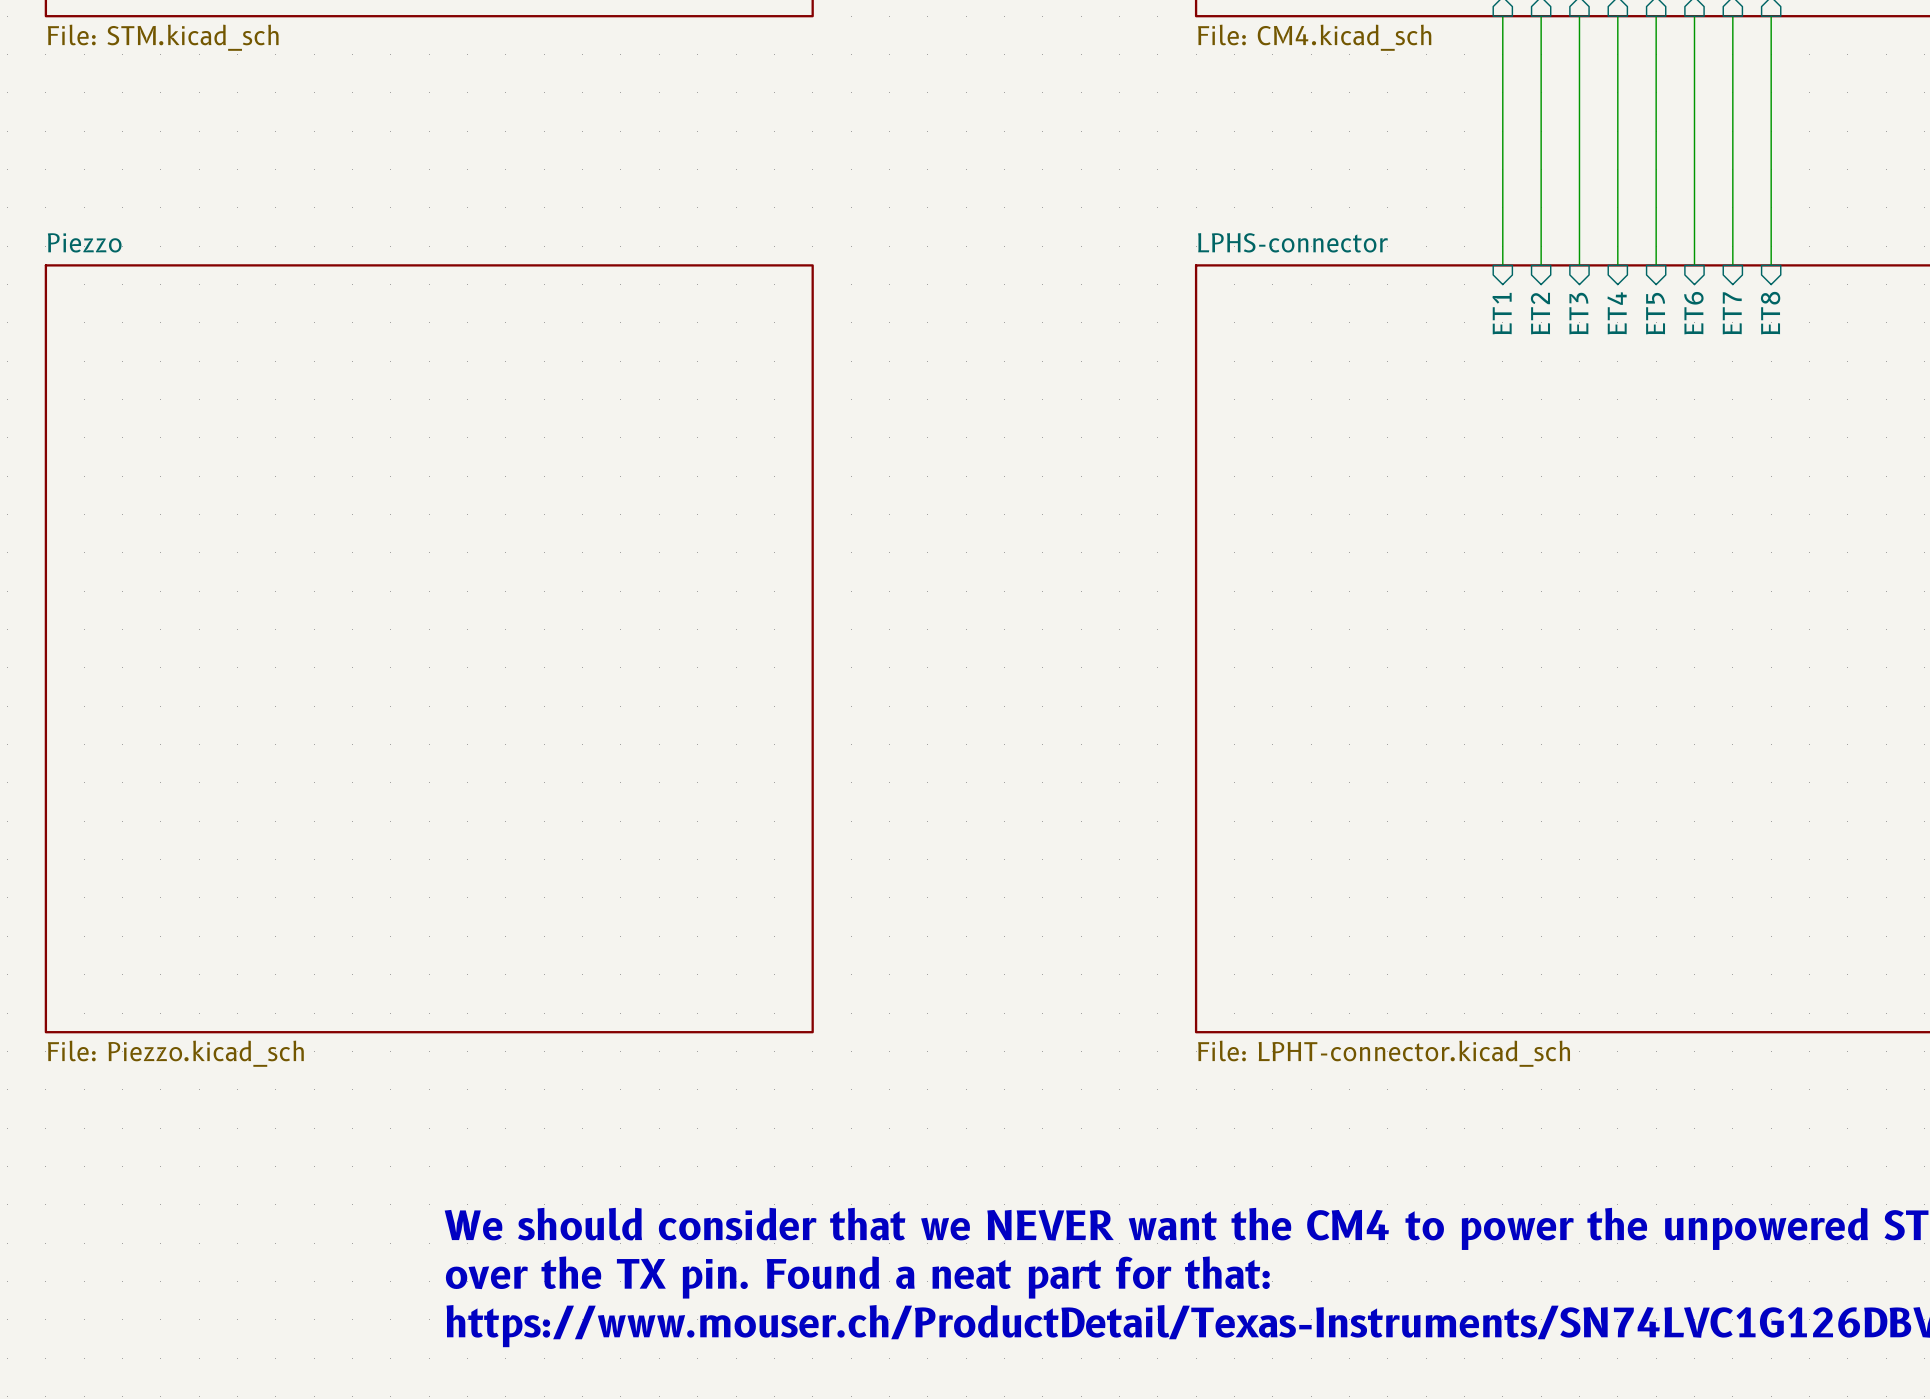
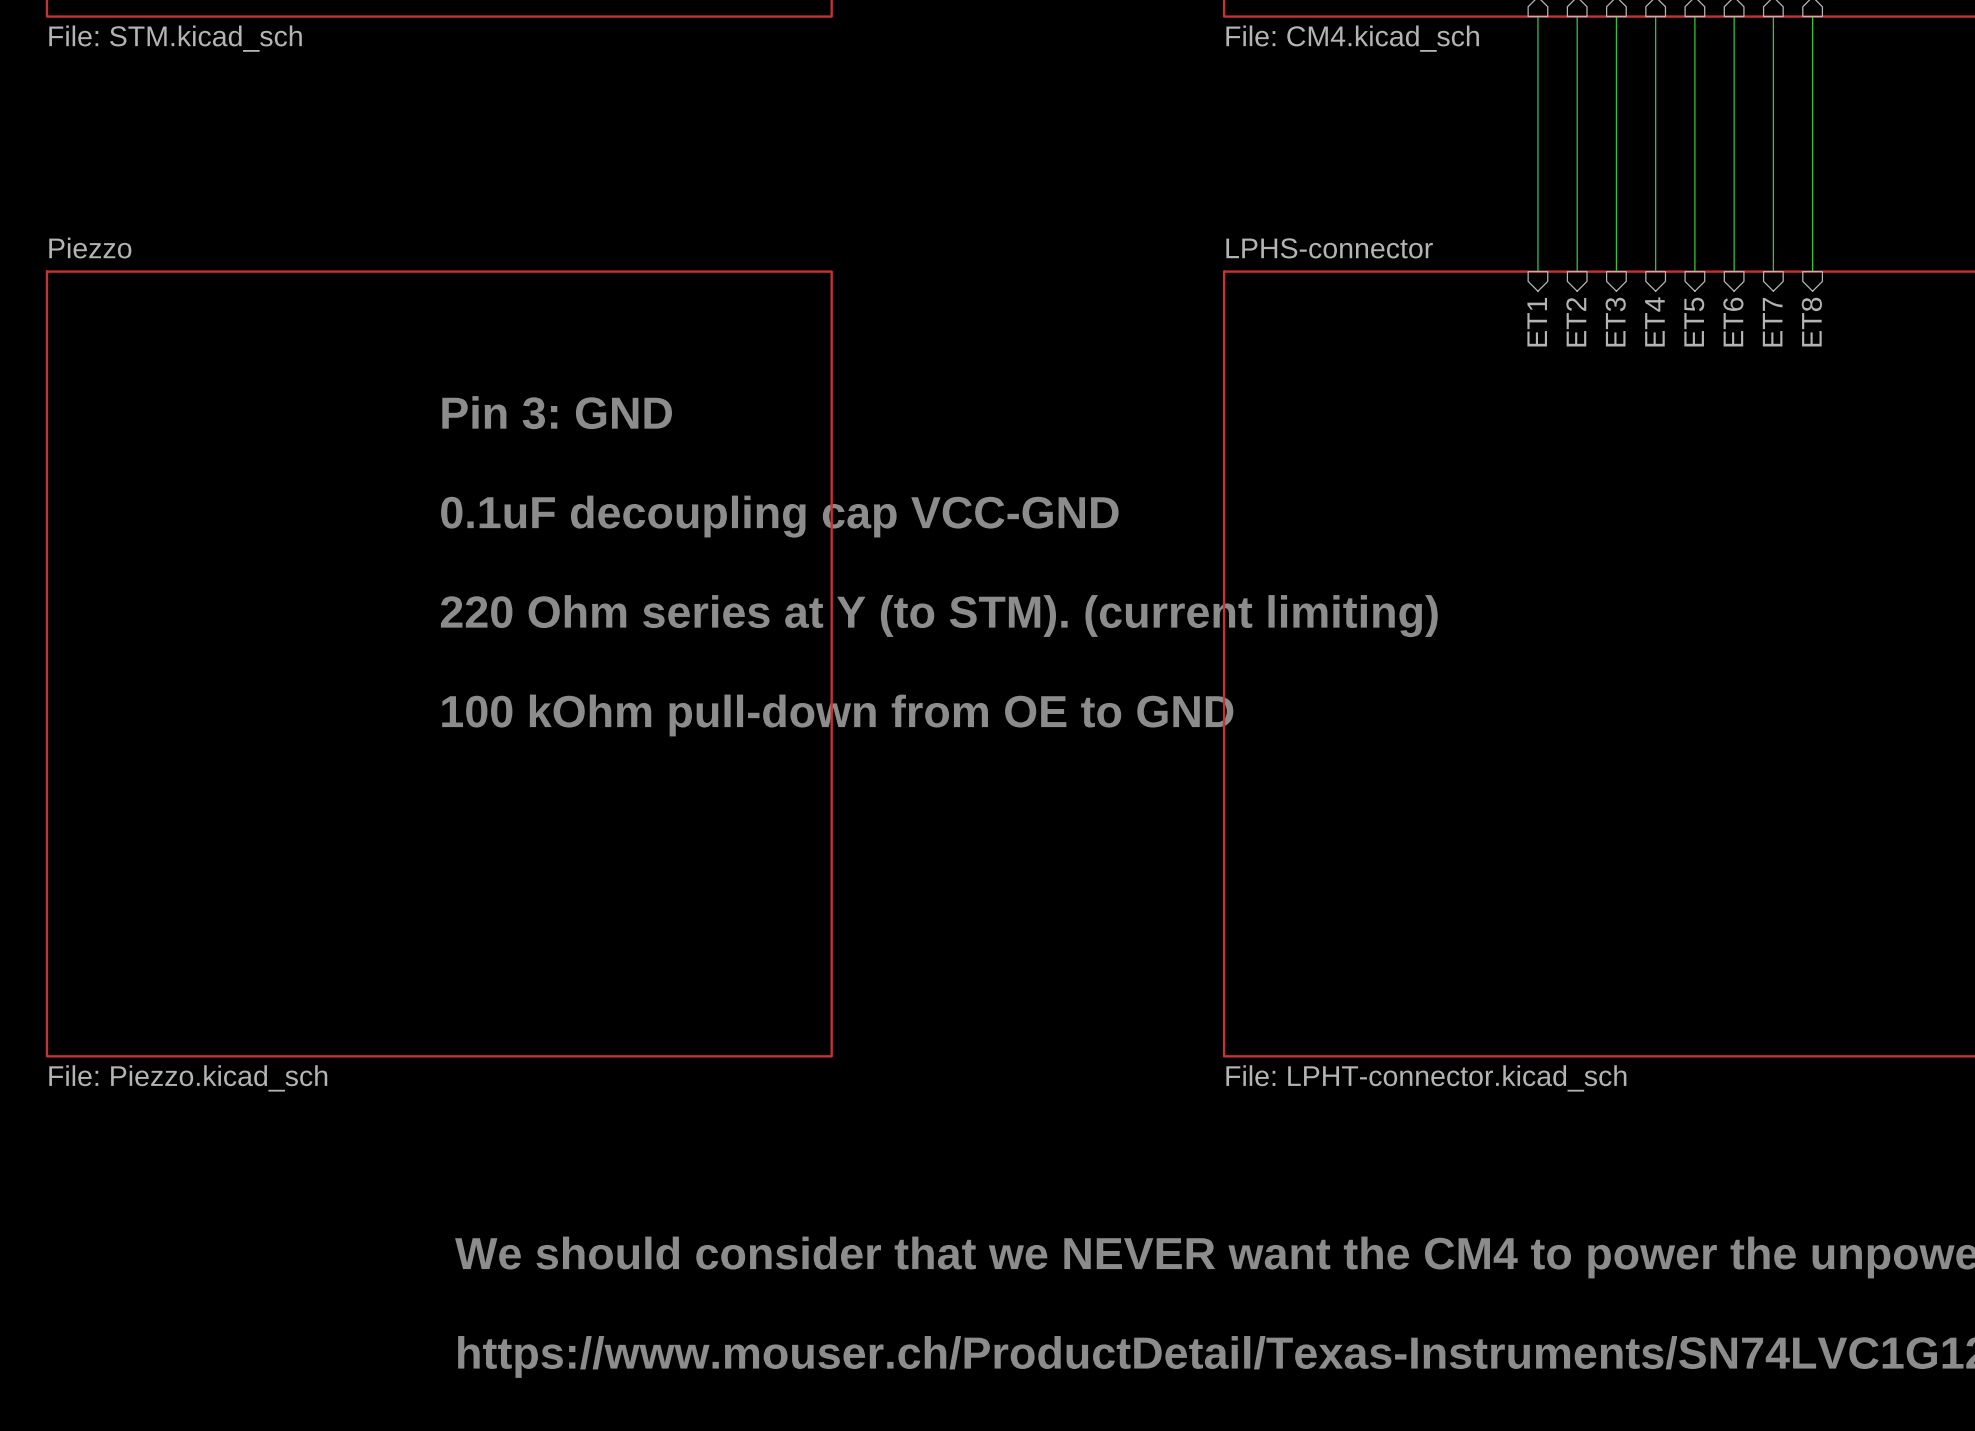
text: none -> Pin 3: GND (557, 412)
text: none -> 0.1uF decoupling cap VCC-GND (779, 516)
text: none -> 220 Ohm series at Y (to STM). (current limiting) (939, 616)
text: none -> 100 kOhm pull-down from OE to GND (837, 715)
text: over the TX pin. Found a neat part for that: (857, 1277) -> none

